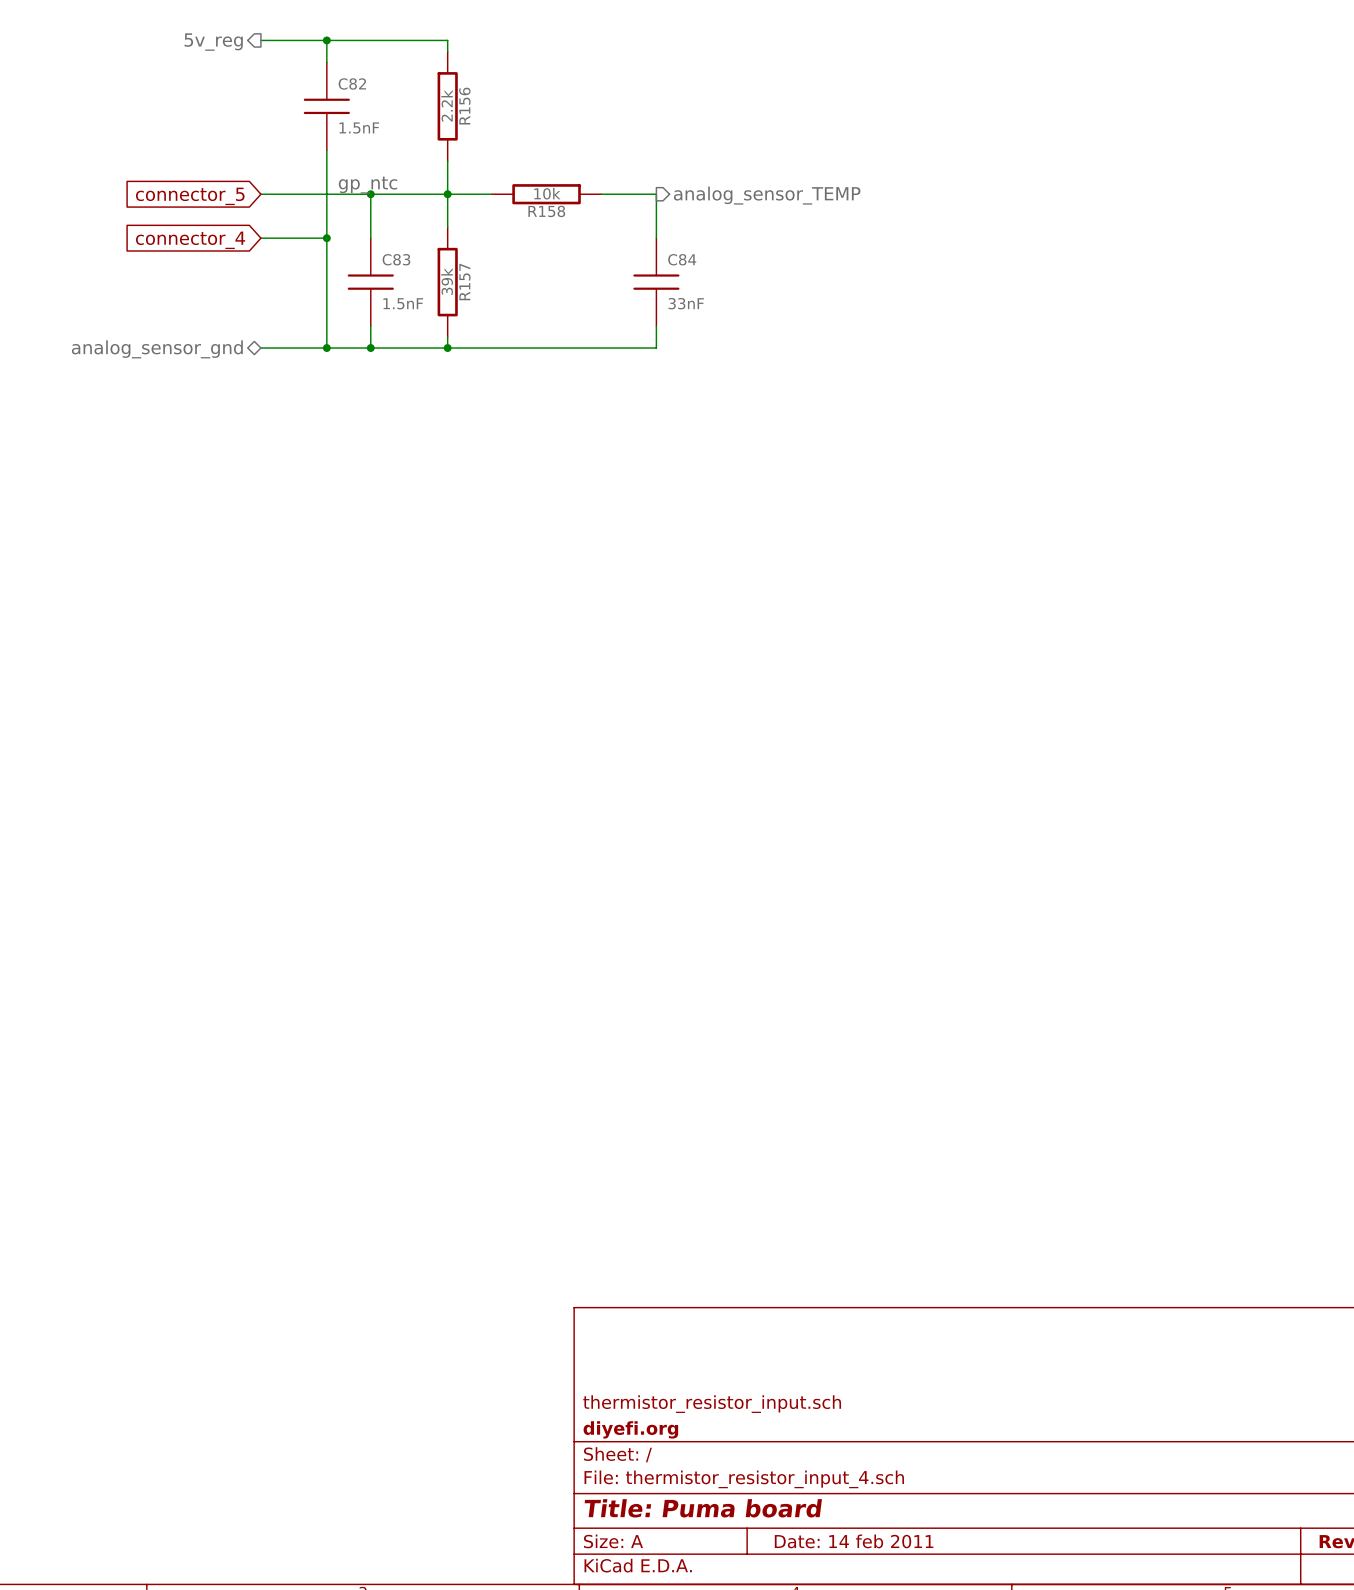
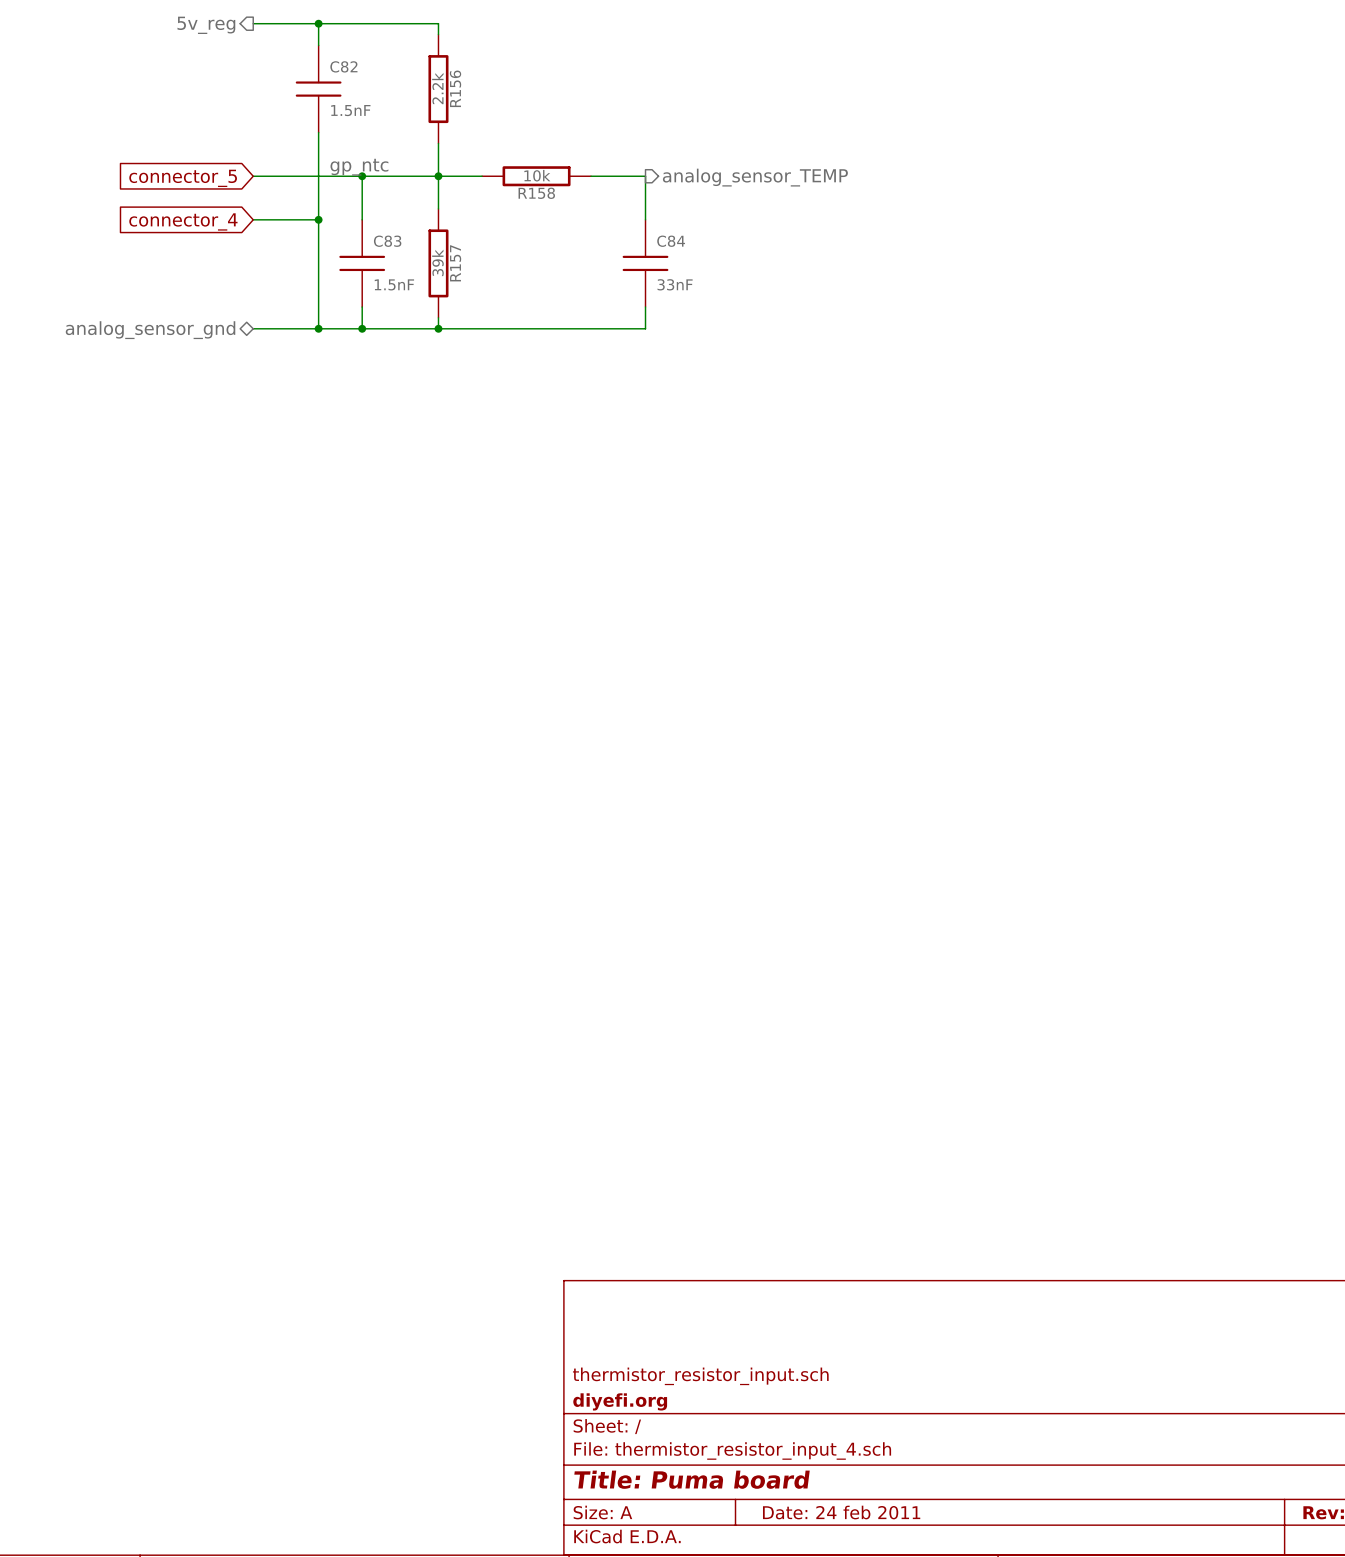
title block: Date: 14 feb 2011 (854, 1541) -> Date: 24 feb 2011 (841, 1512)

